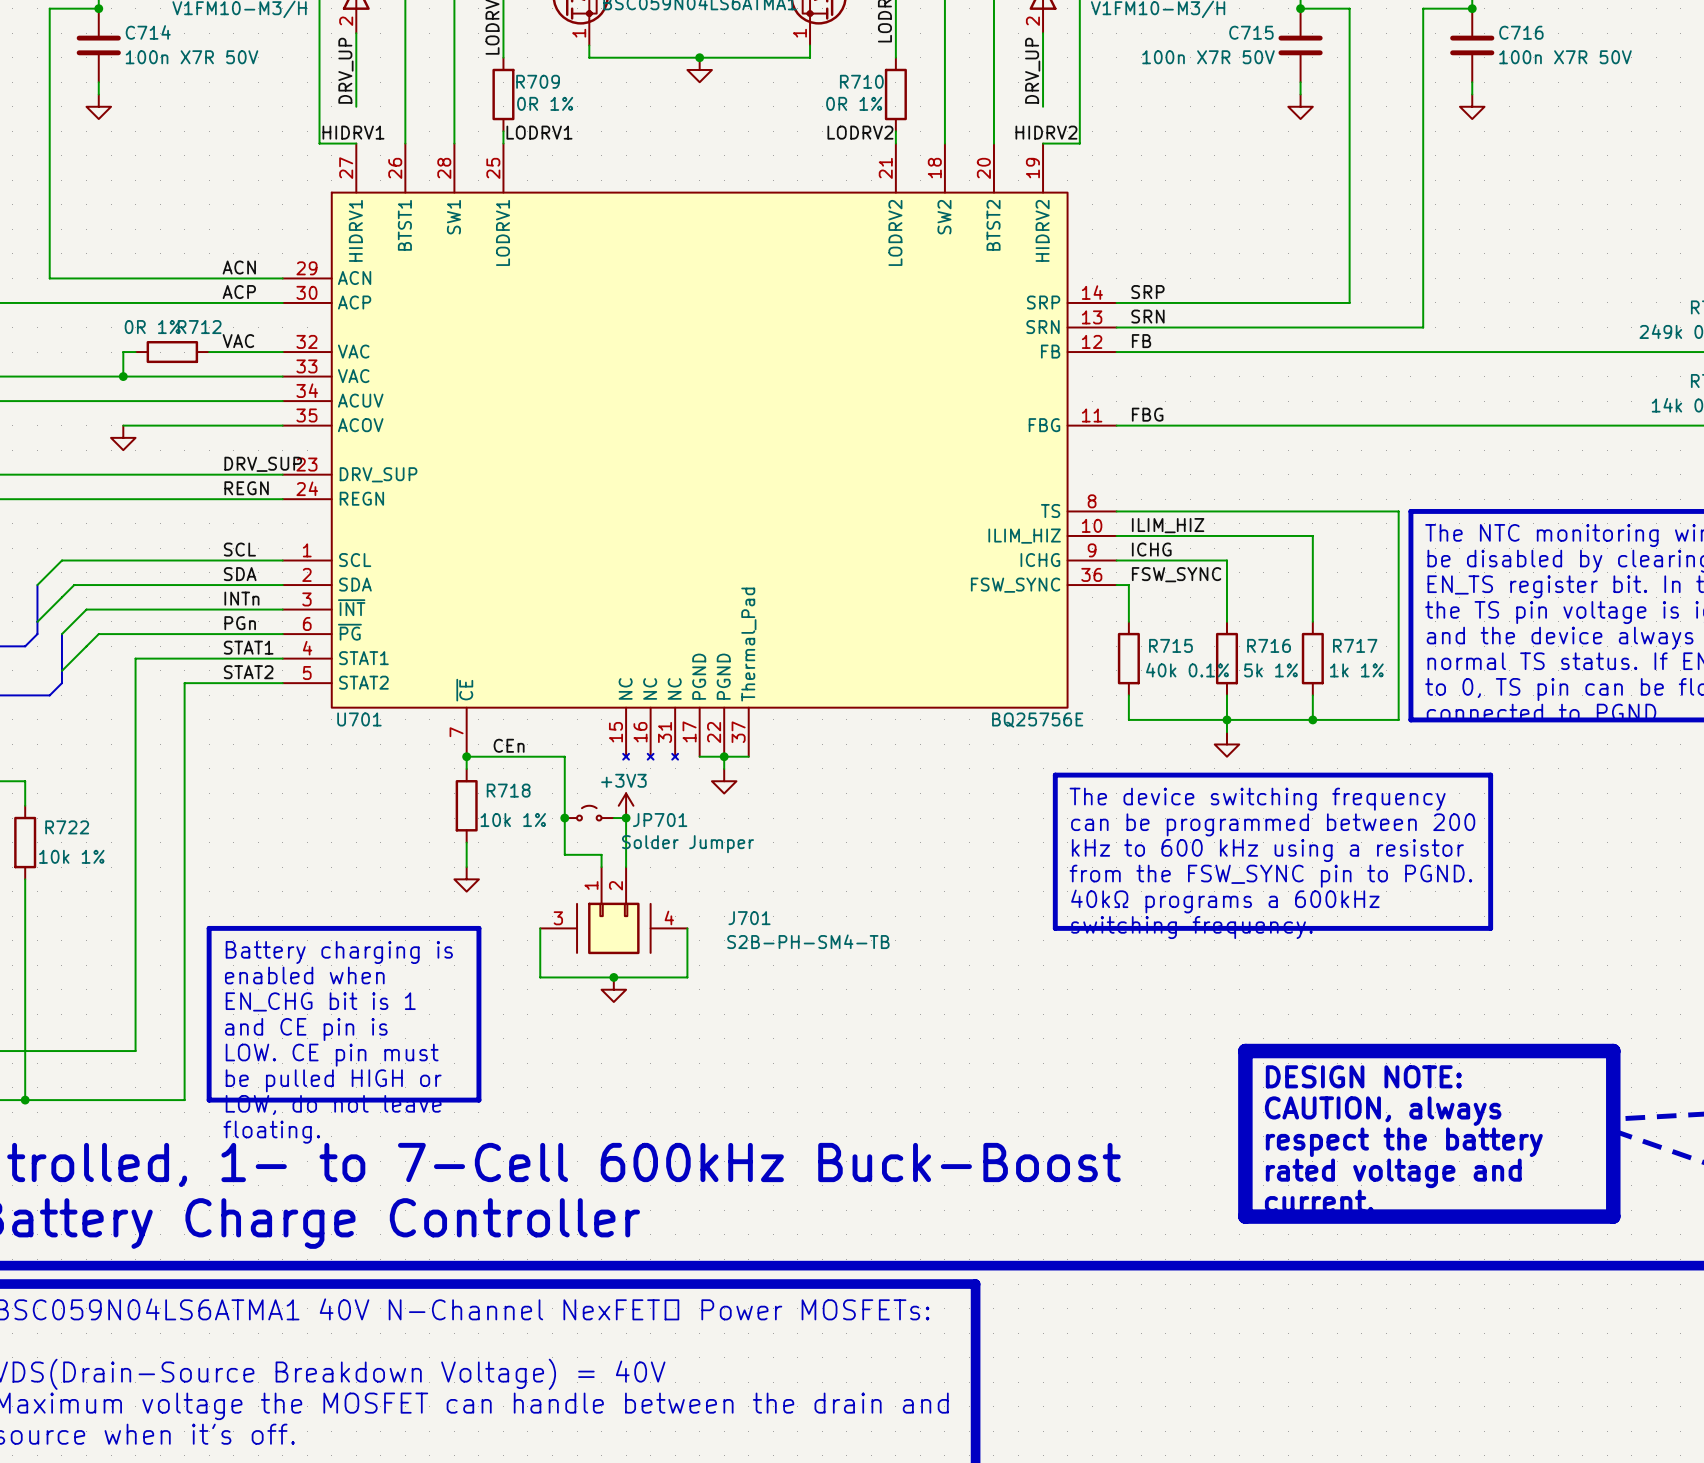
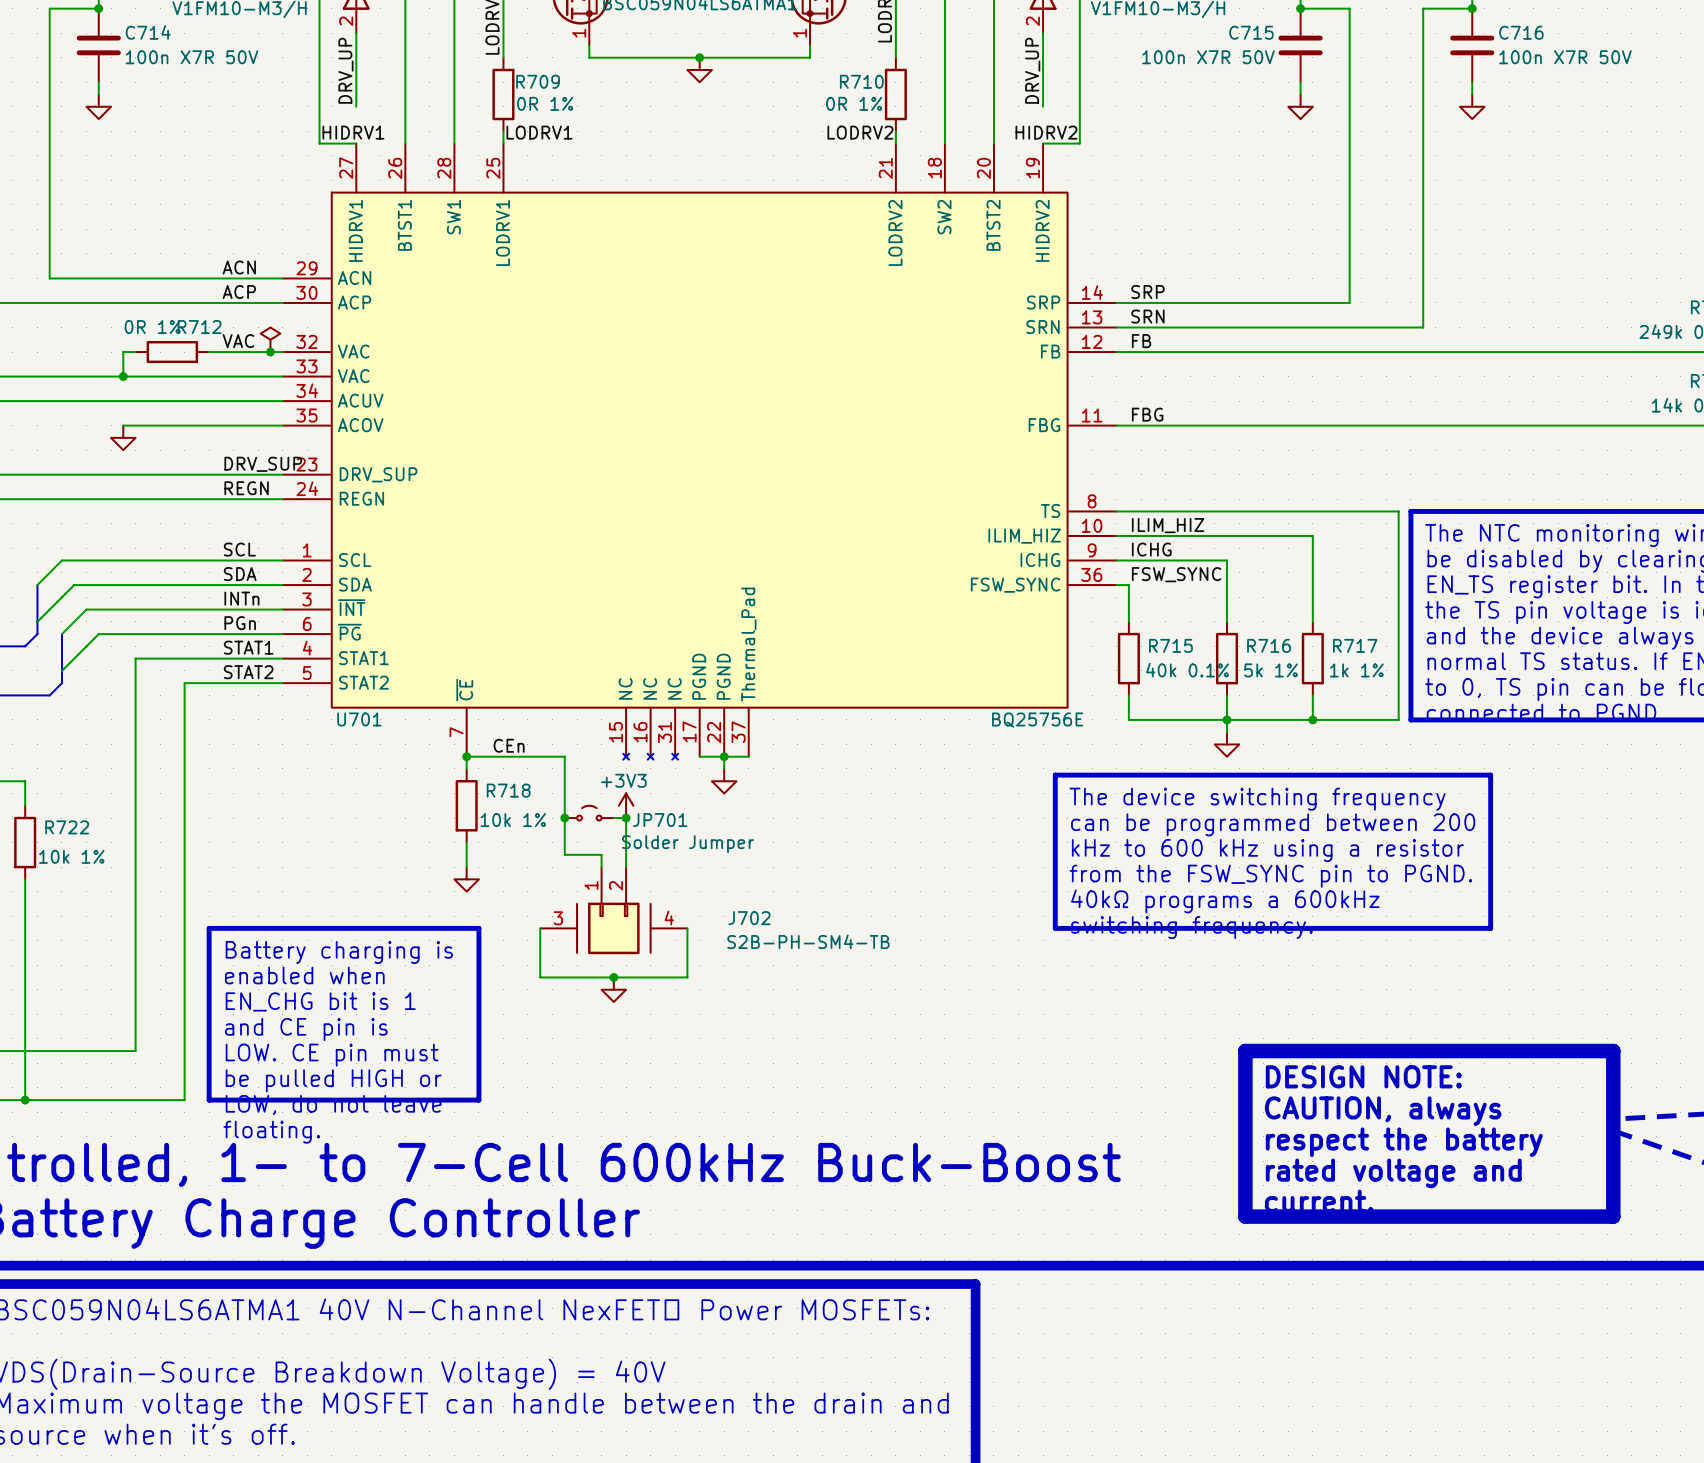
power symbol: none -> (270, 339)
junction: none -> (270, 352)
J701 name: J701 (749, 918) -> J702 (749, 918)

